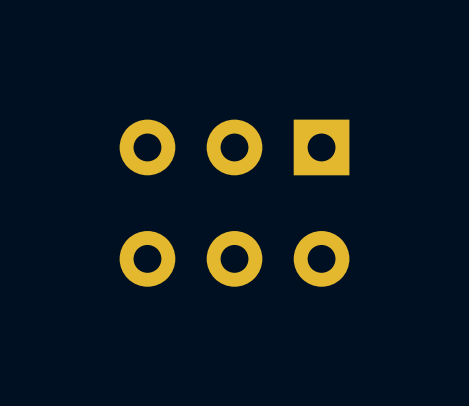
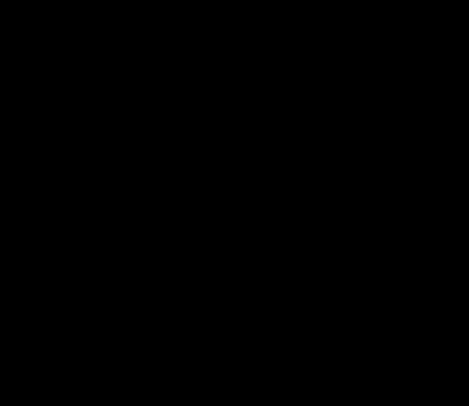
part: (234, 203) -> none

